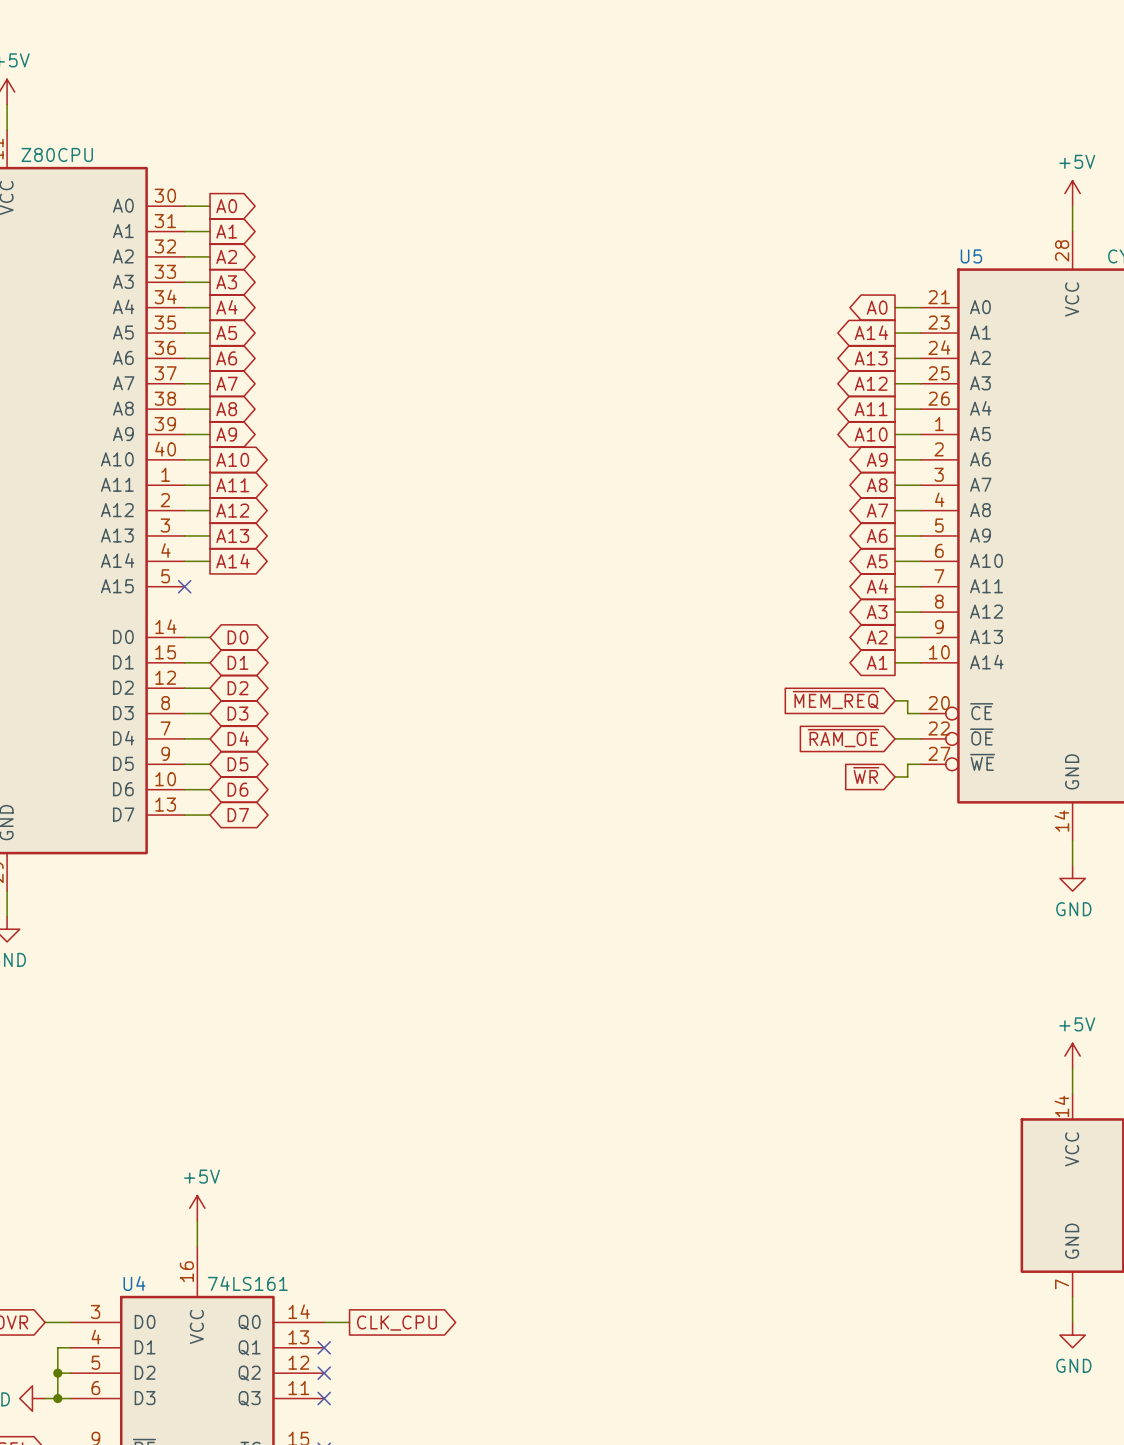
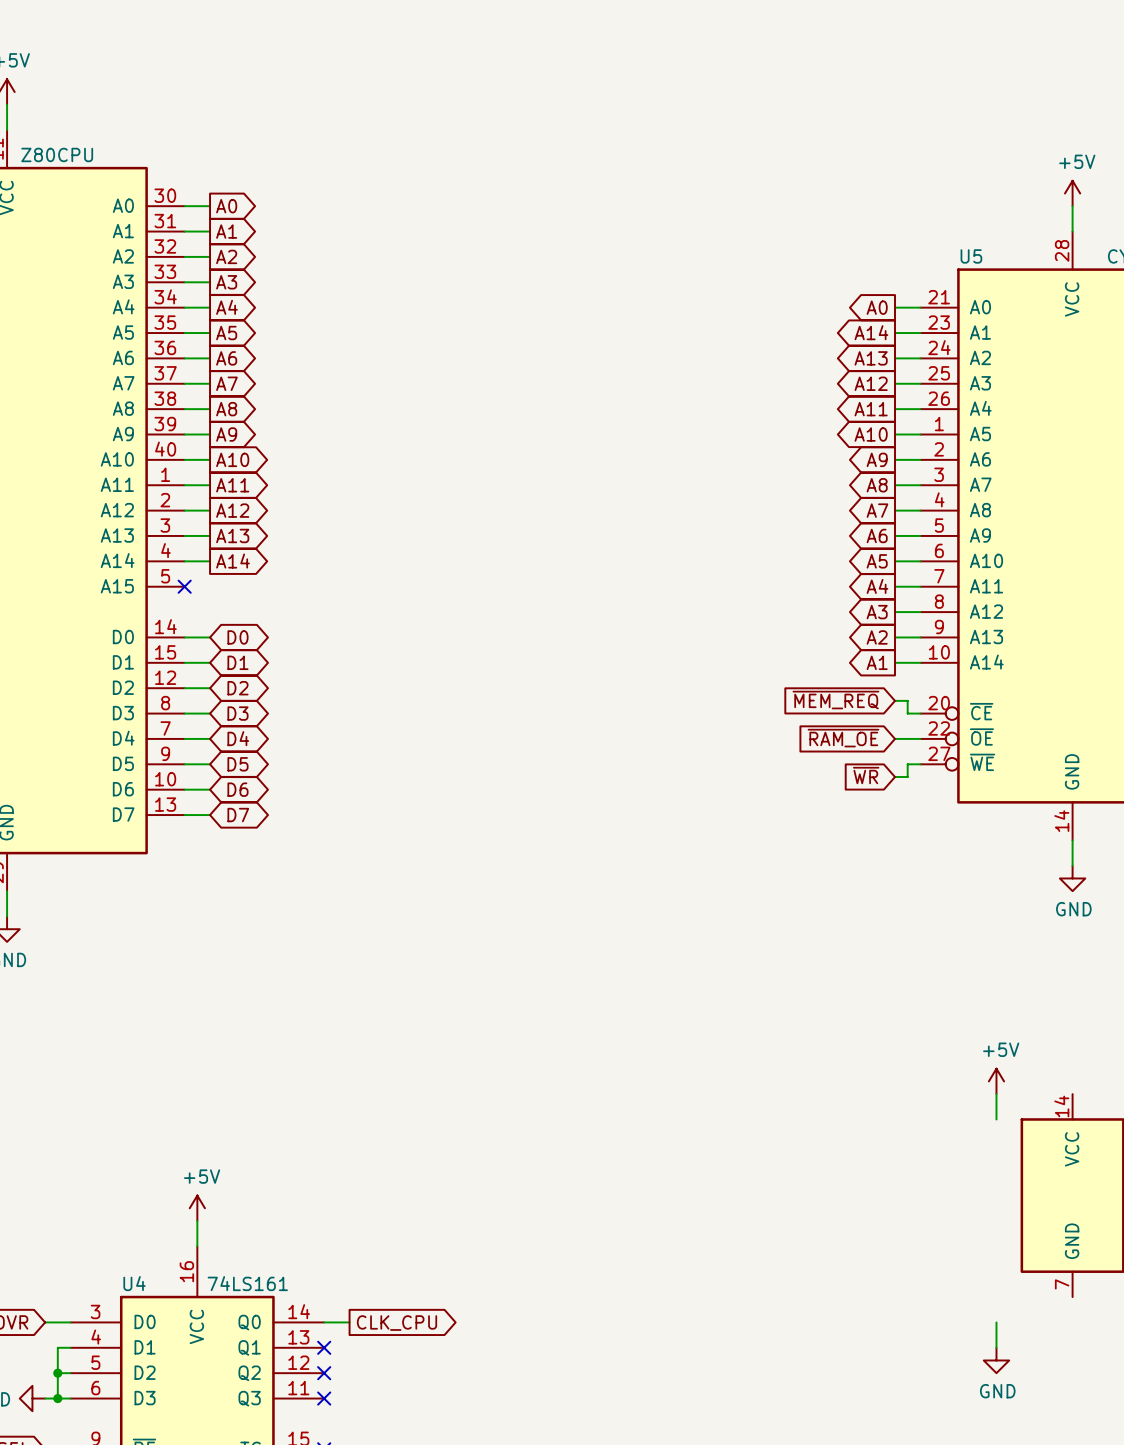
power symbol position: +5V (1072, 1056) -> +5V (996, 1081)
wire: (1072, 1068) (1072, 1094) -> (996, 1094) (996, 1119)
wire: (1072, 1297) (1072, 1322) -> (996, 1322) (996, 1347)
power symbol position: GND (1072, 1335) -> GND (996, 1360)

